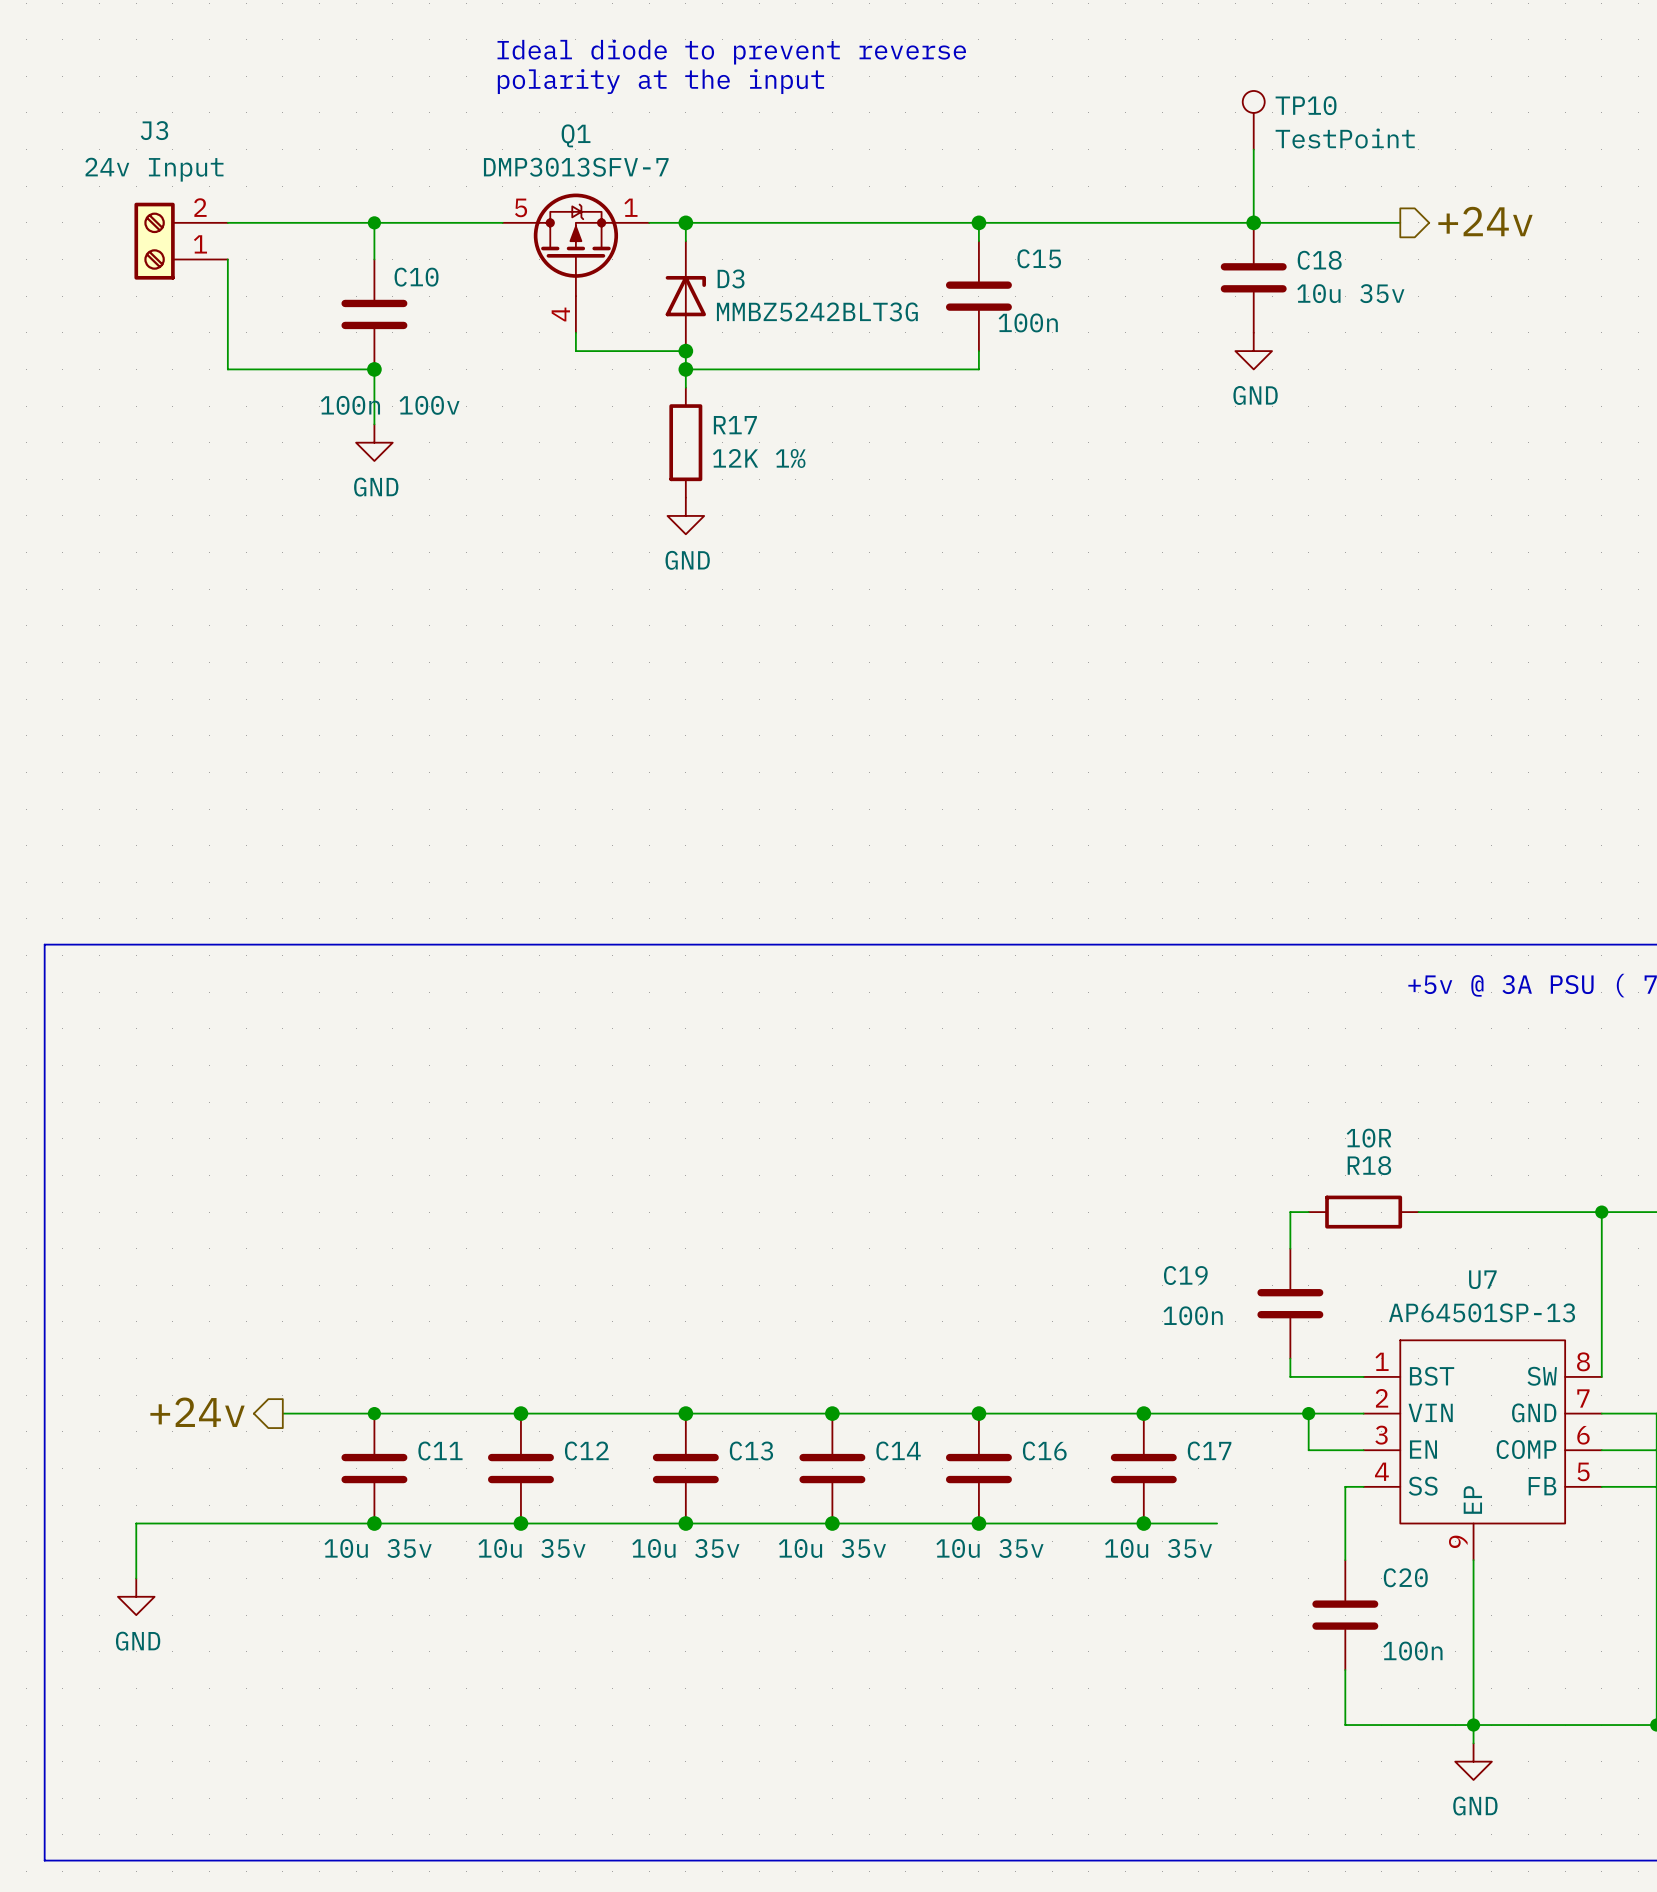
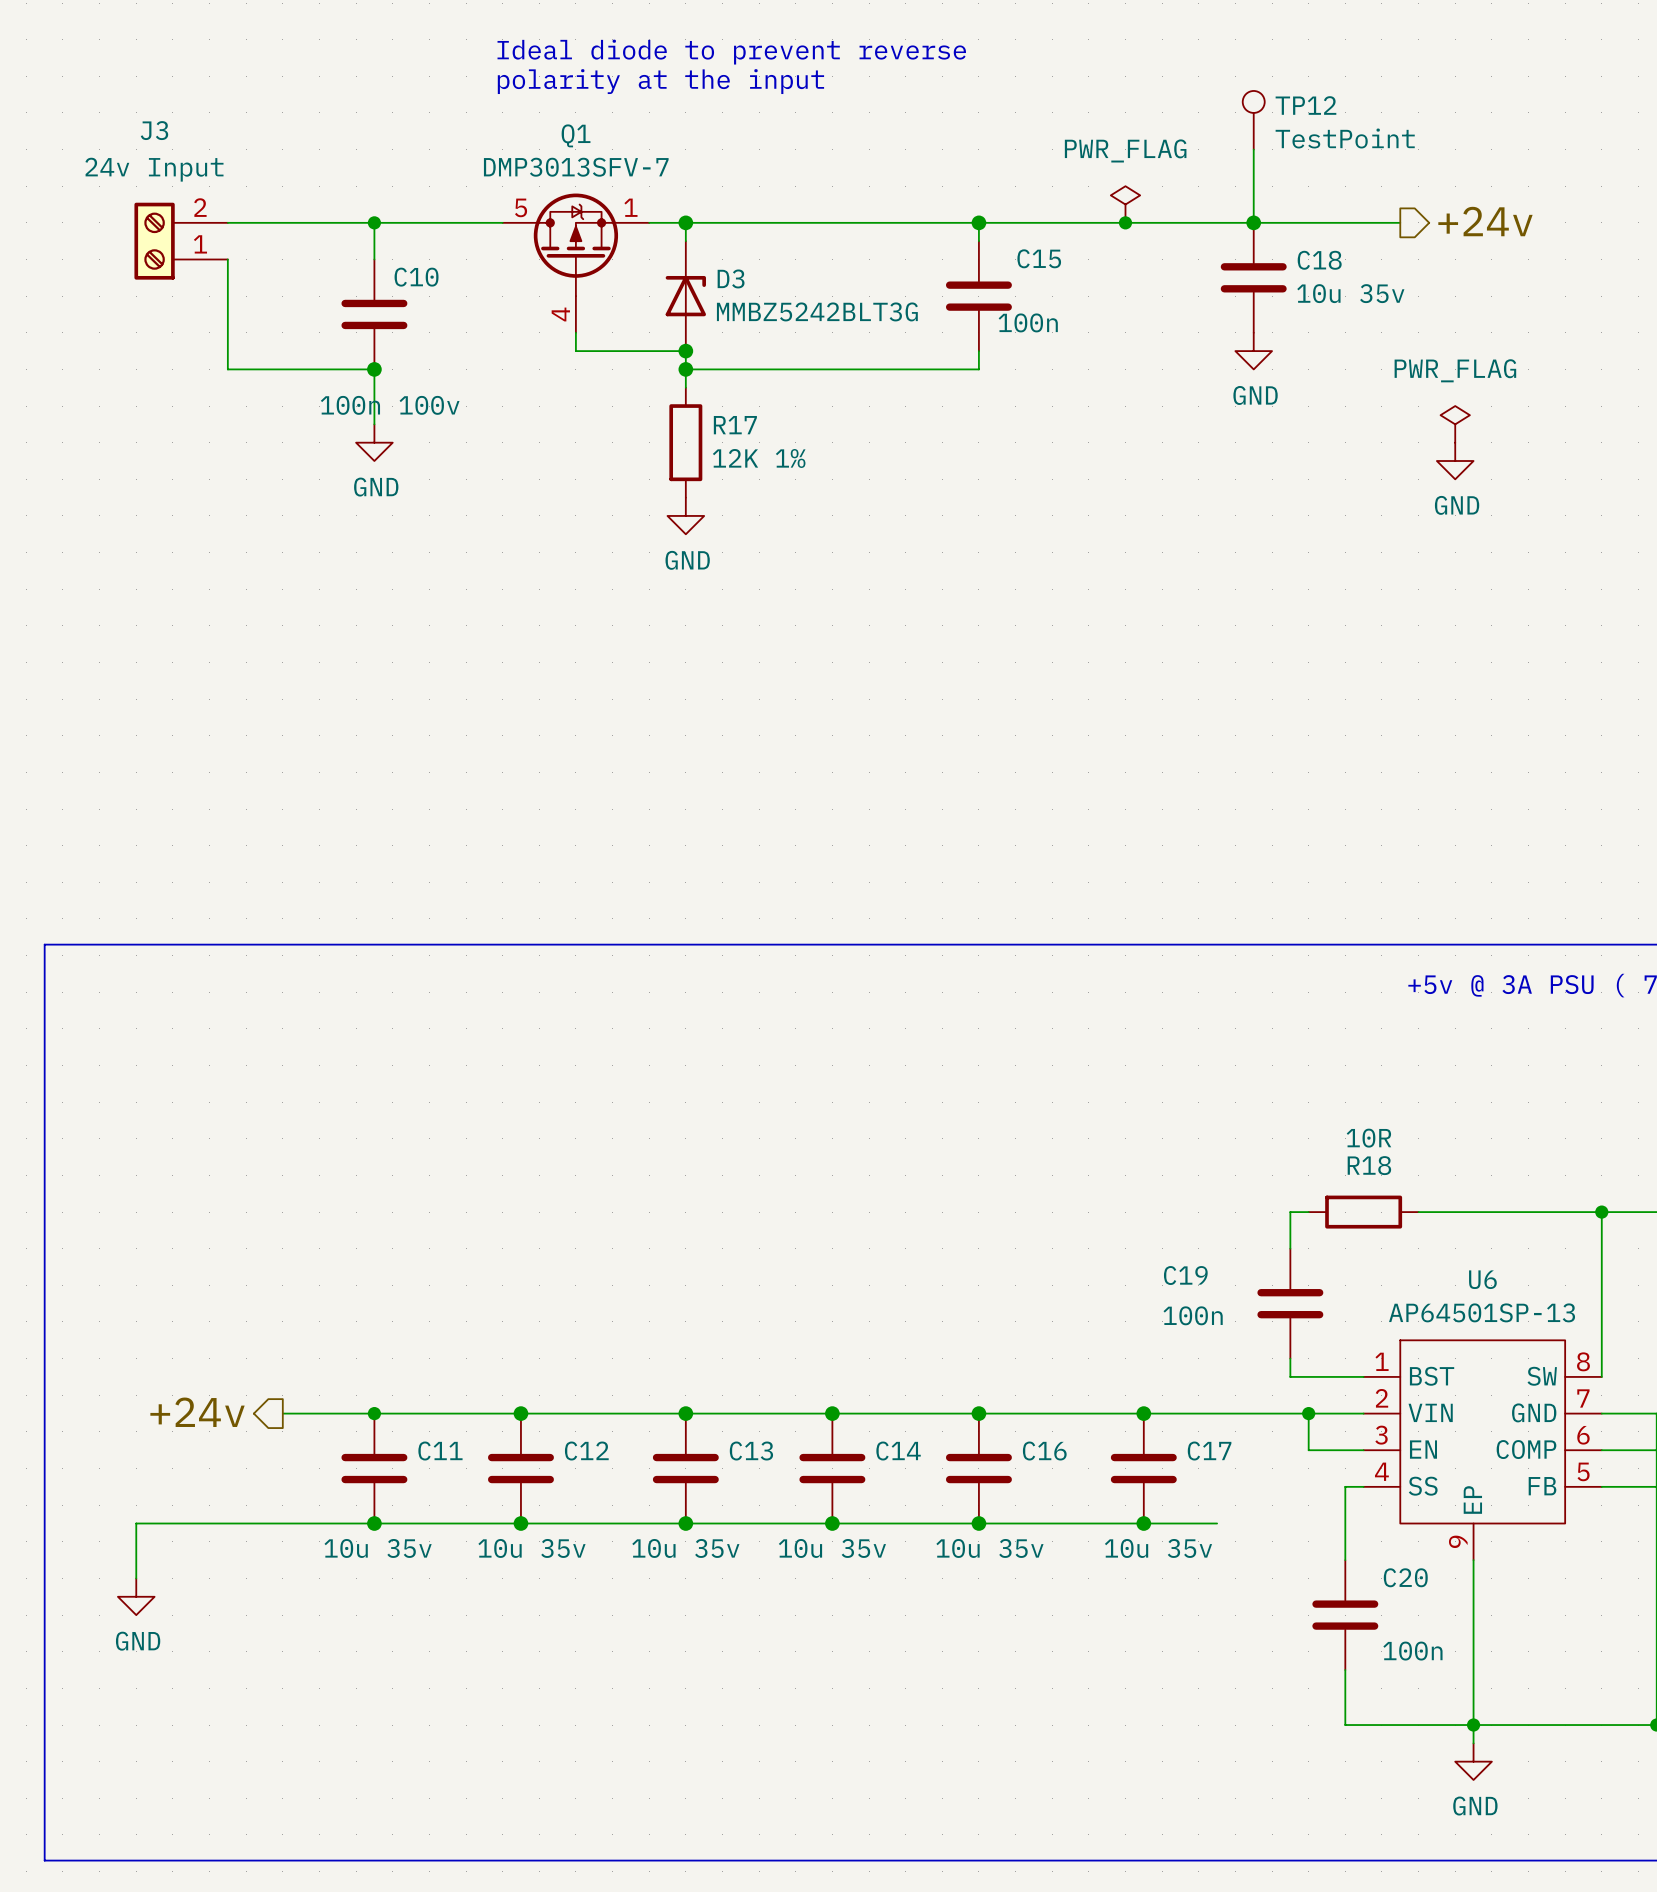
TP10 name: TP10 (1306, 105) -> TP12 (1305, 105)
power symbol: none -> PWR_FLAG (1125, 204)
junction: none -> (1125, 222)
power symbol: none -> PWR_FLAG (1455, 424)
power symbol: none -> GND (1455, 461)
U7 name: U7 (1482, 1279) -> U6 (1482, 1279)

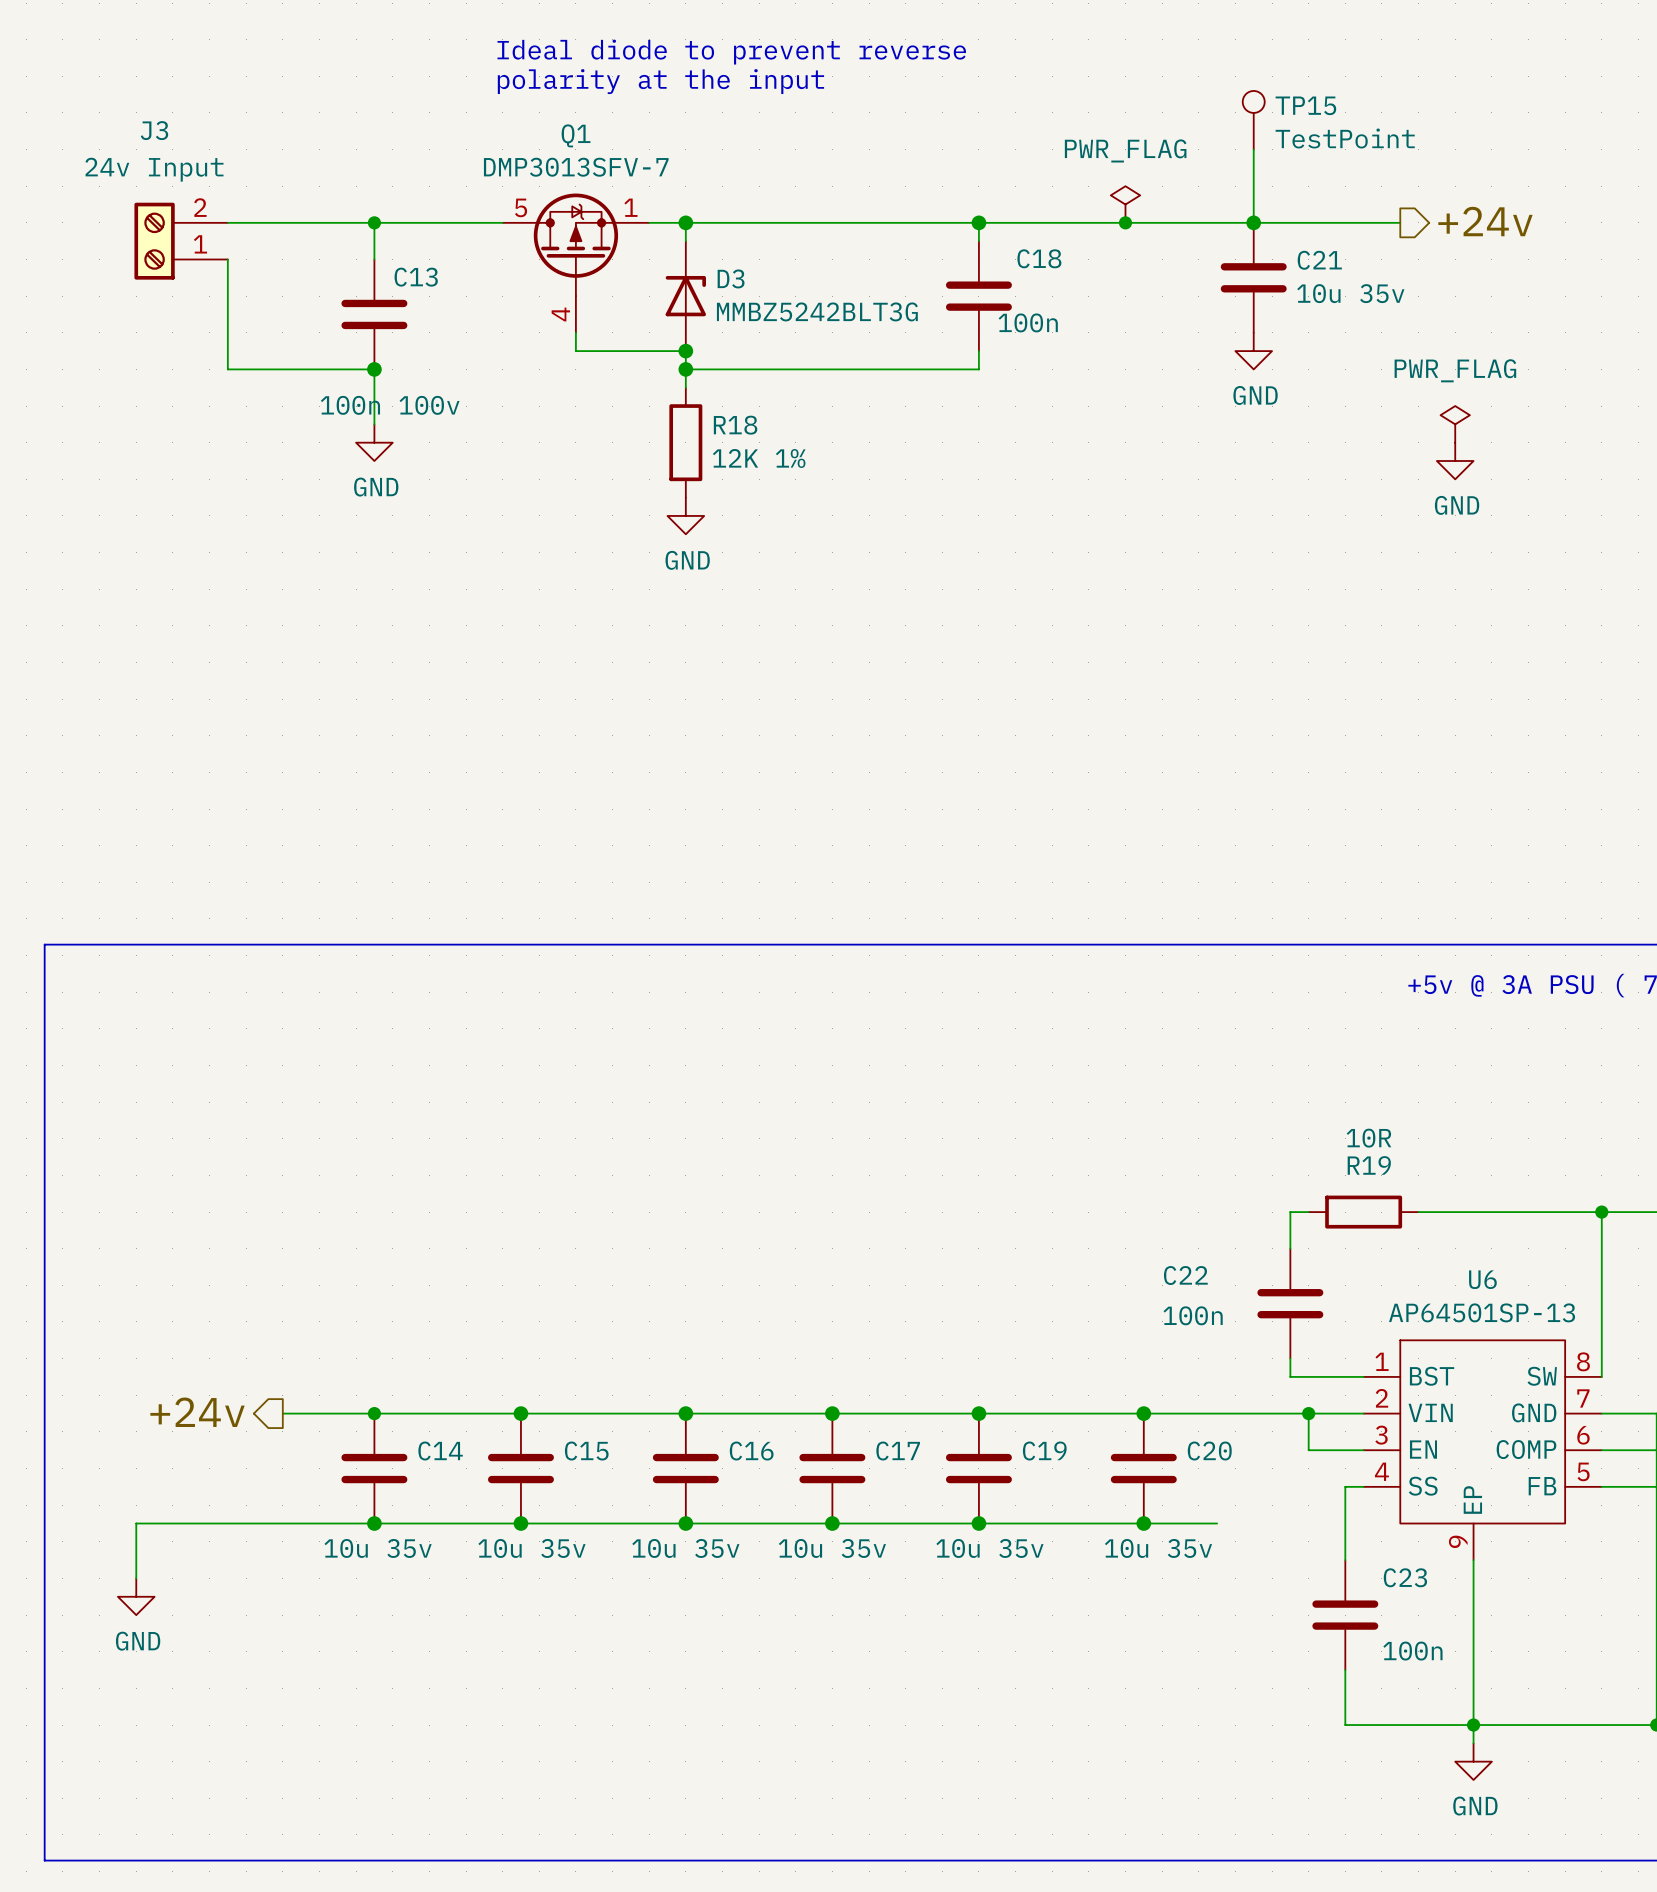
TP12 name: TP12 (1305, 105) -> TP15 (1305, 105)
C15 name: C15 (1039, 258) -> C18 (1039, 258)
C18 name: C18 (1319, 260) -> C21 (1319, 260)
C10 name: C10 (416, 277) -> C13 (416, 277)
R17 name: R17 (735, 425) -> R18 (735, 425)
R18 name: R18 (1369, 1165) -> R19 (1369, 1165)
C19 name: C19 (1185, 1275) -> C22 (1185, 1275)
C11 name: C11 (440, 1451) -> C14 (440, 1451)
C12 name: C12 (586, 1451) -> C15 (586, 1451)
C13 name: C13 (751, 1451) -> C16 (751, 1451)
C14 name: C14 (898, 1451) -> C17 (898, 1451)
C16 name: C16 (1044, 1451) -> C19 (1044, 1451)
C17 name: C17 (1209, 1451) -> C20 (1209, 1451)
C20 name: C20 (1405, 1577) -> C23 (1405, 1577)

